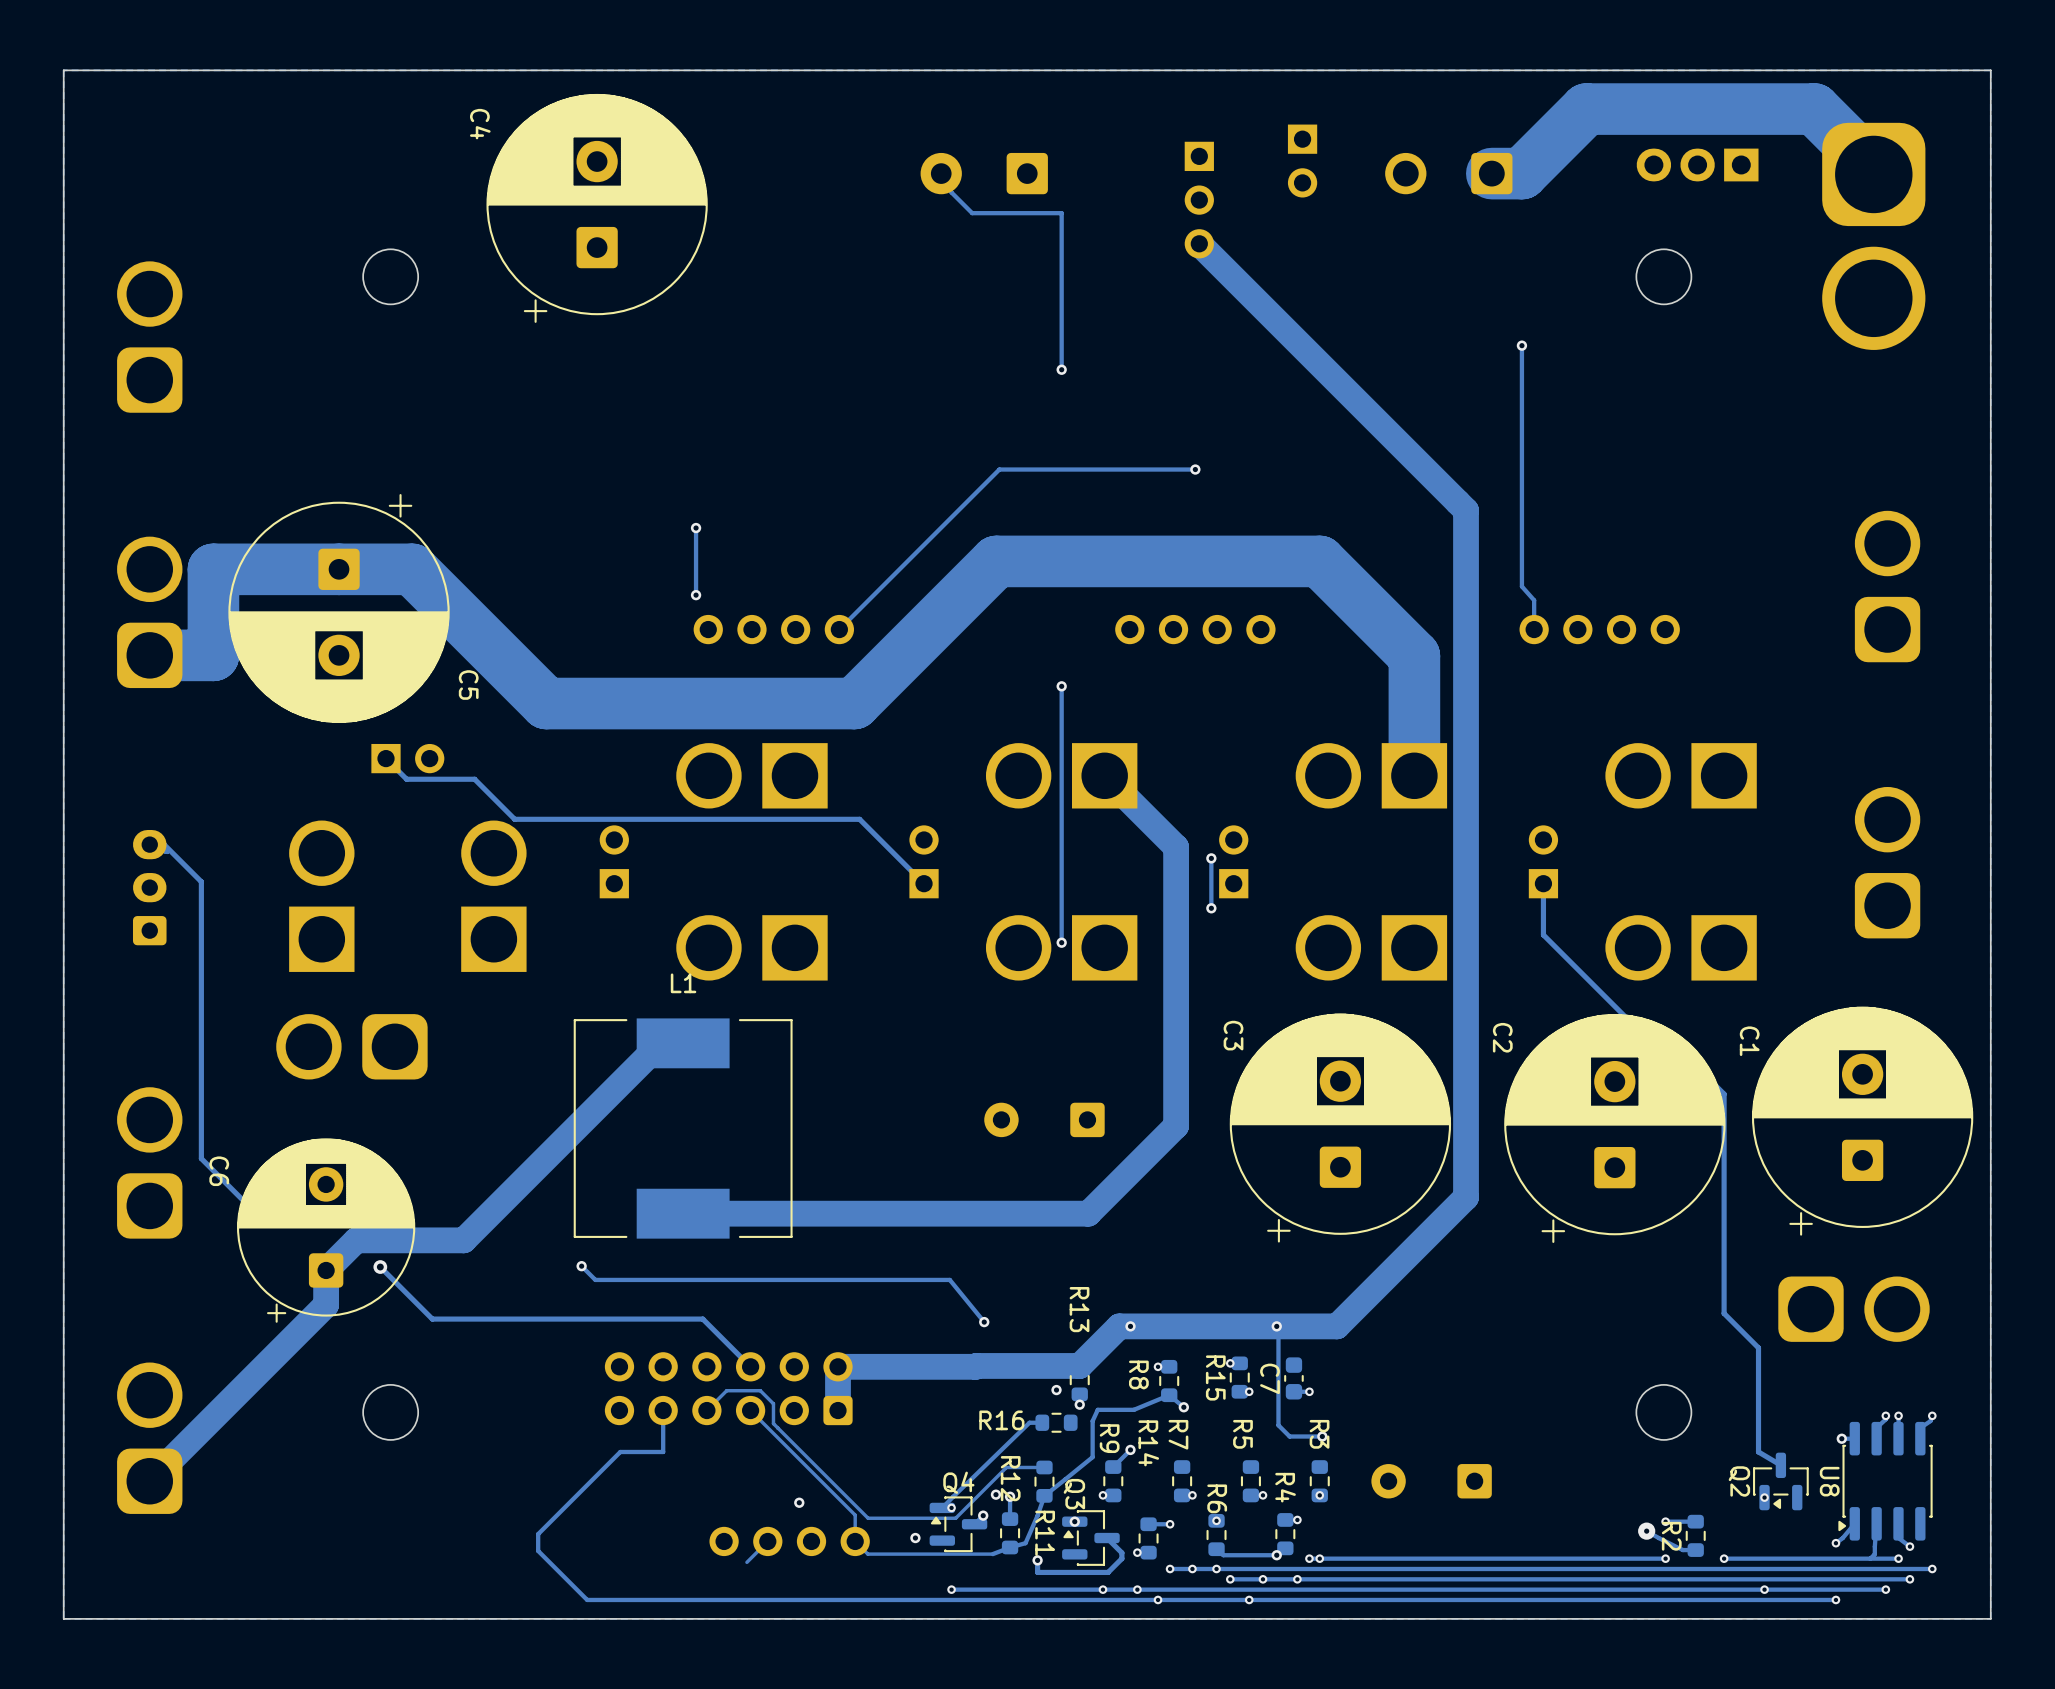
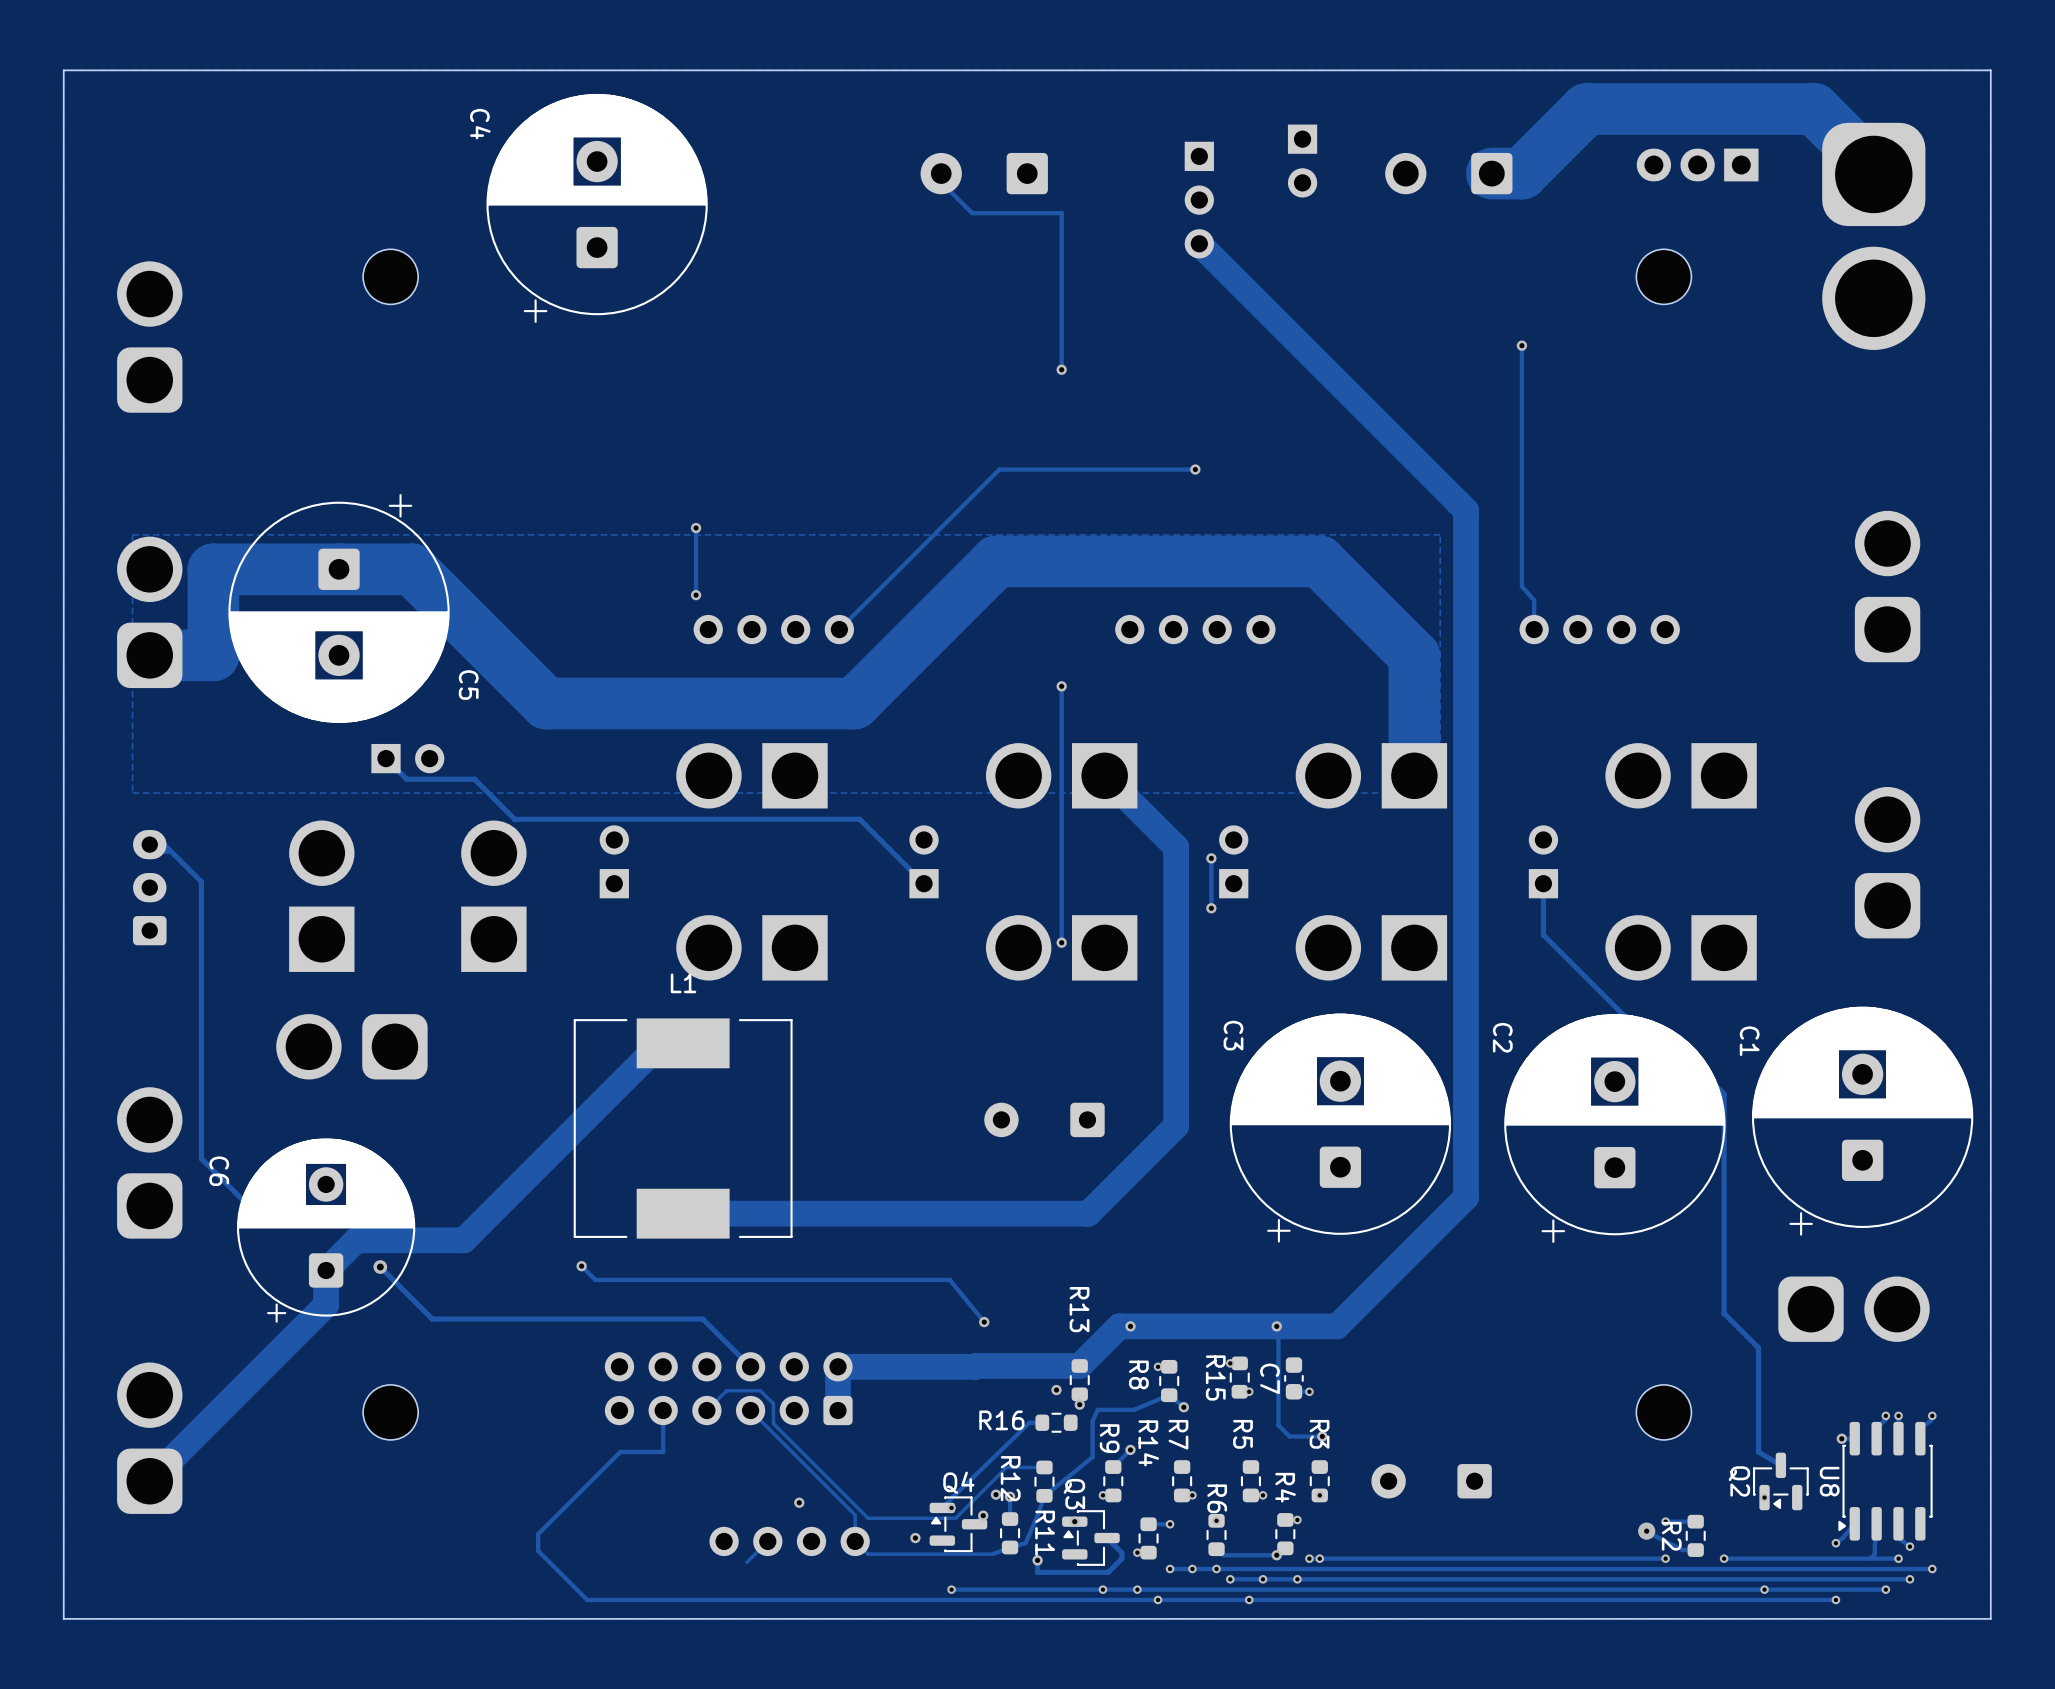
zone outline: none -> (1440, 534) (132, 534) (132, 793) (1440, 793) (1440, 534)

